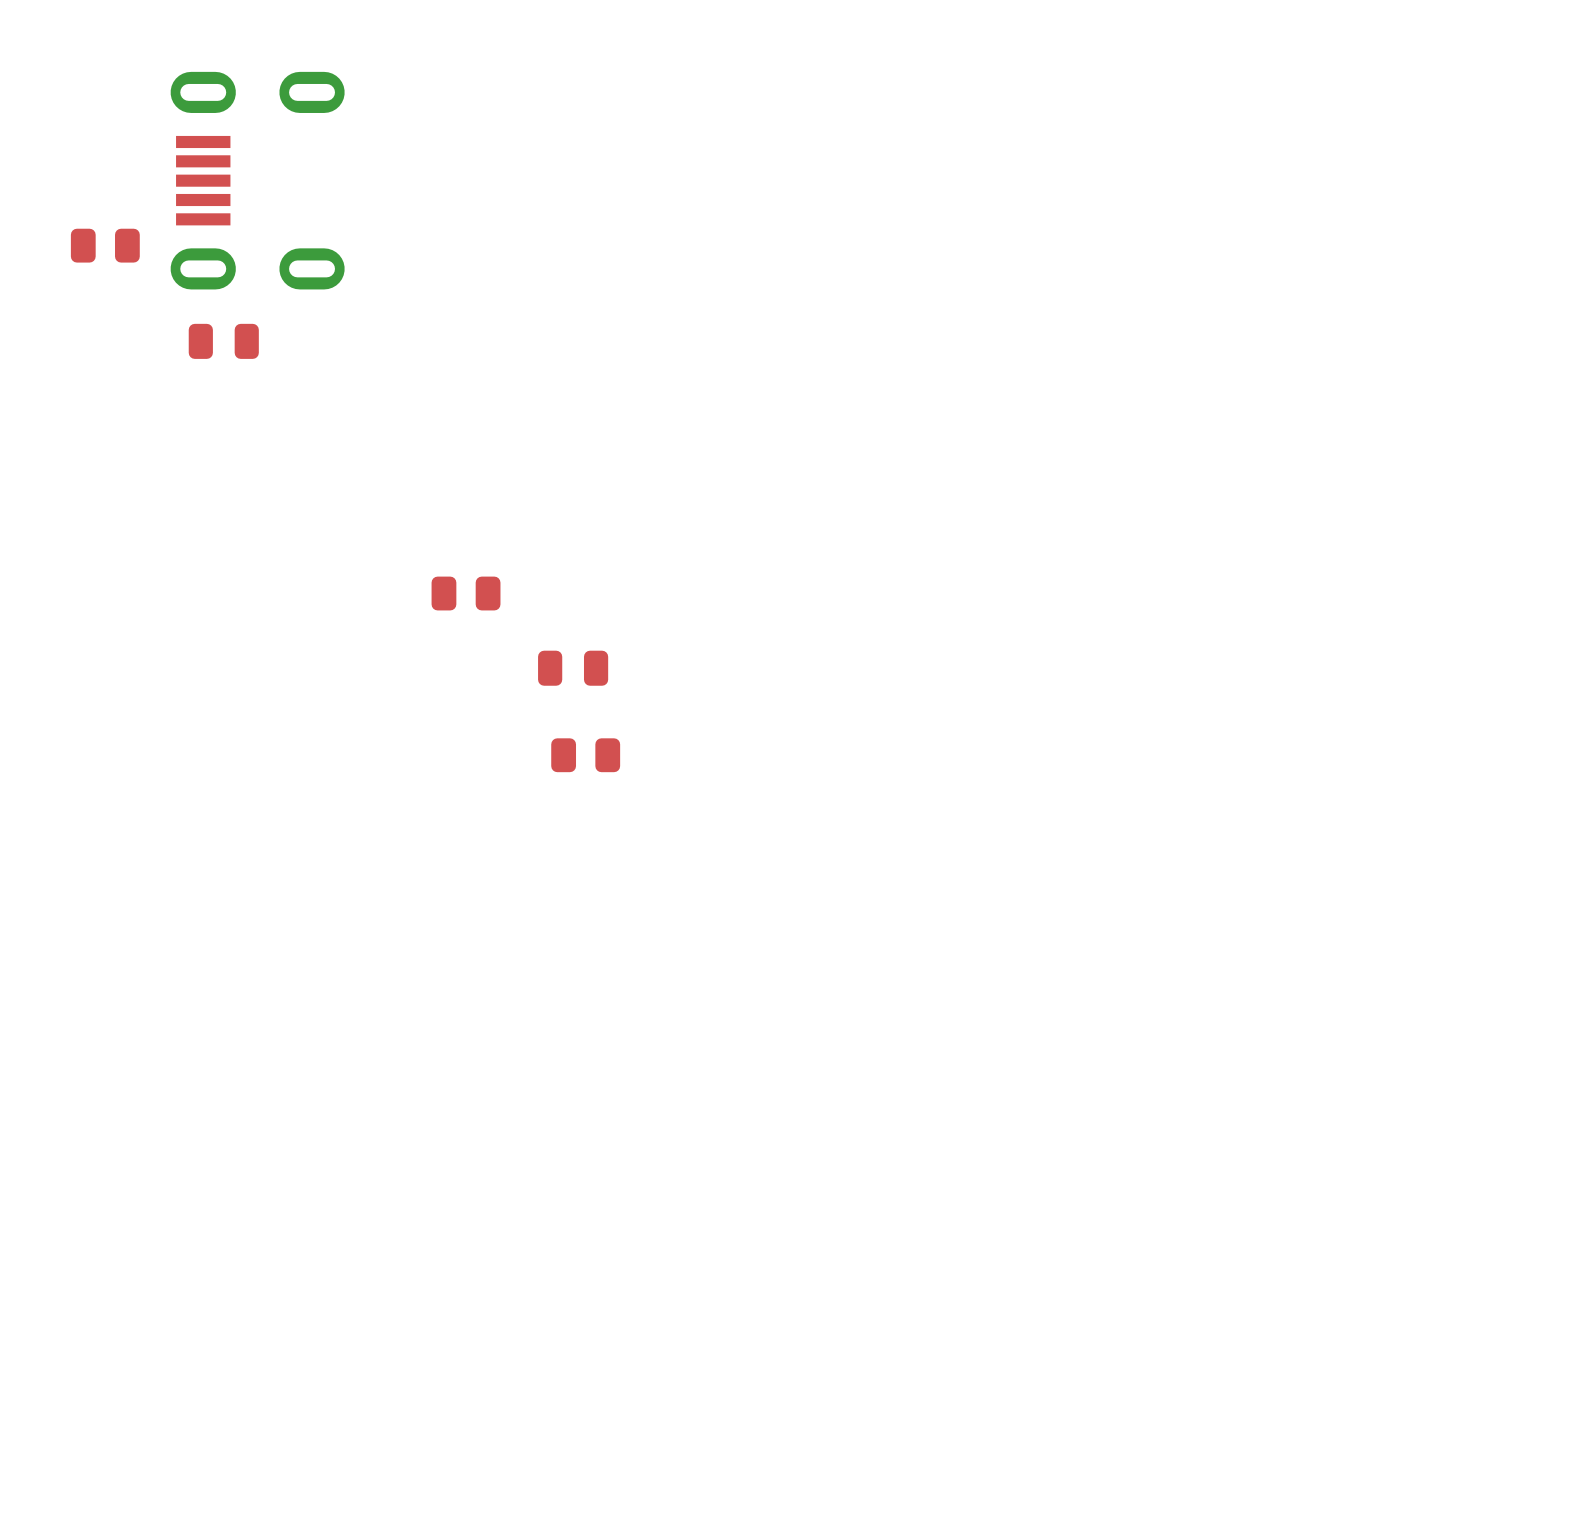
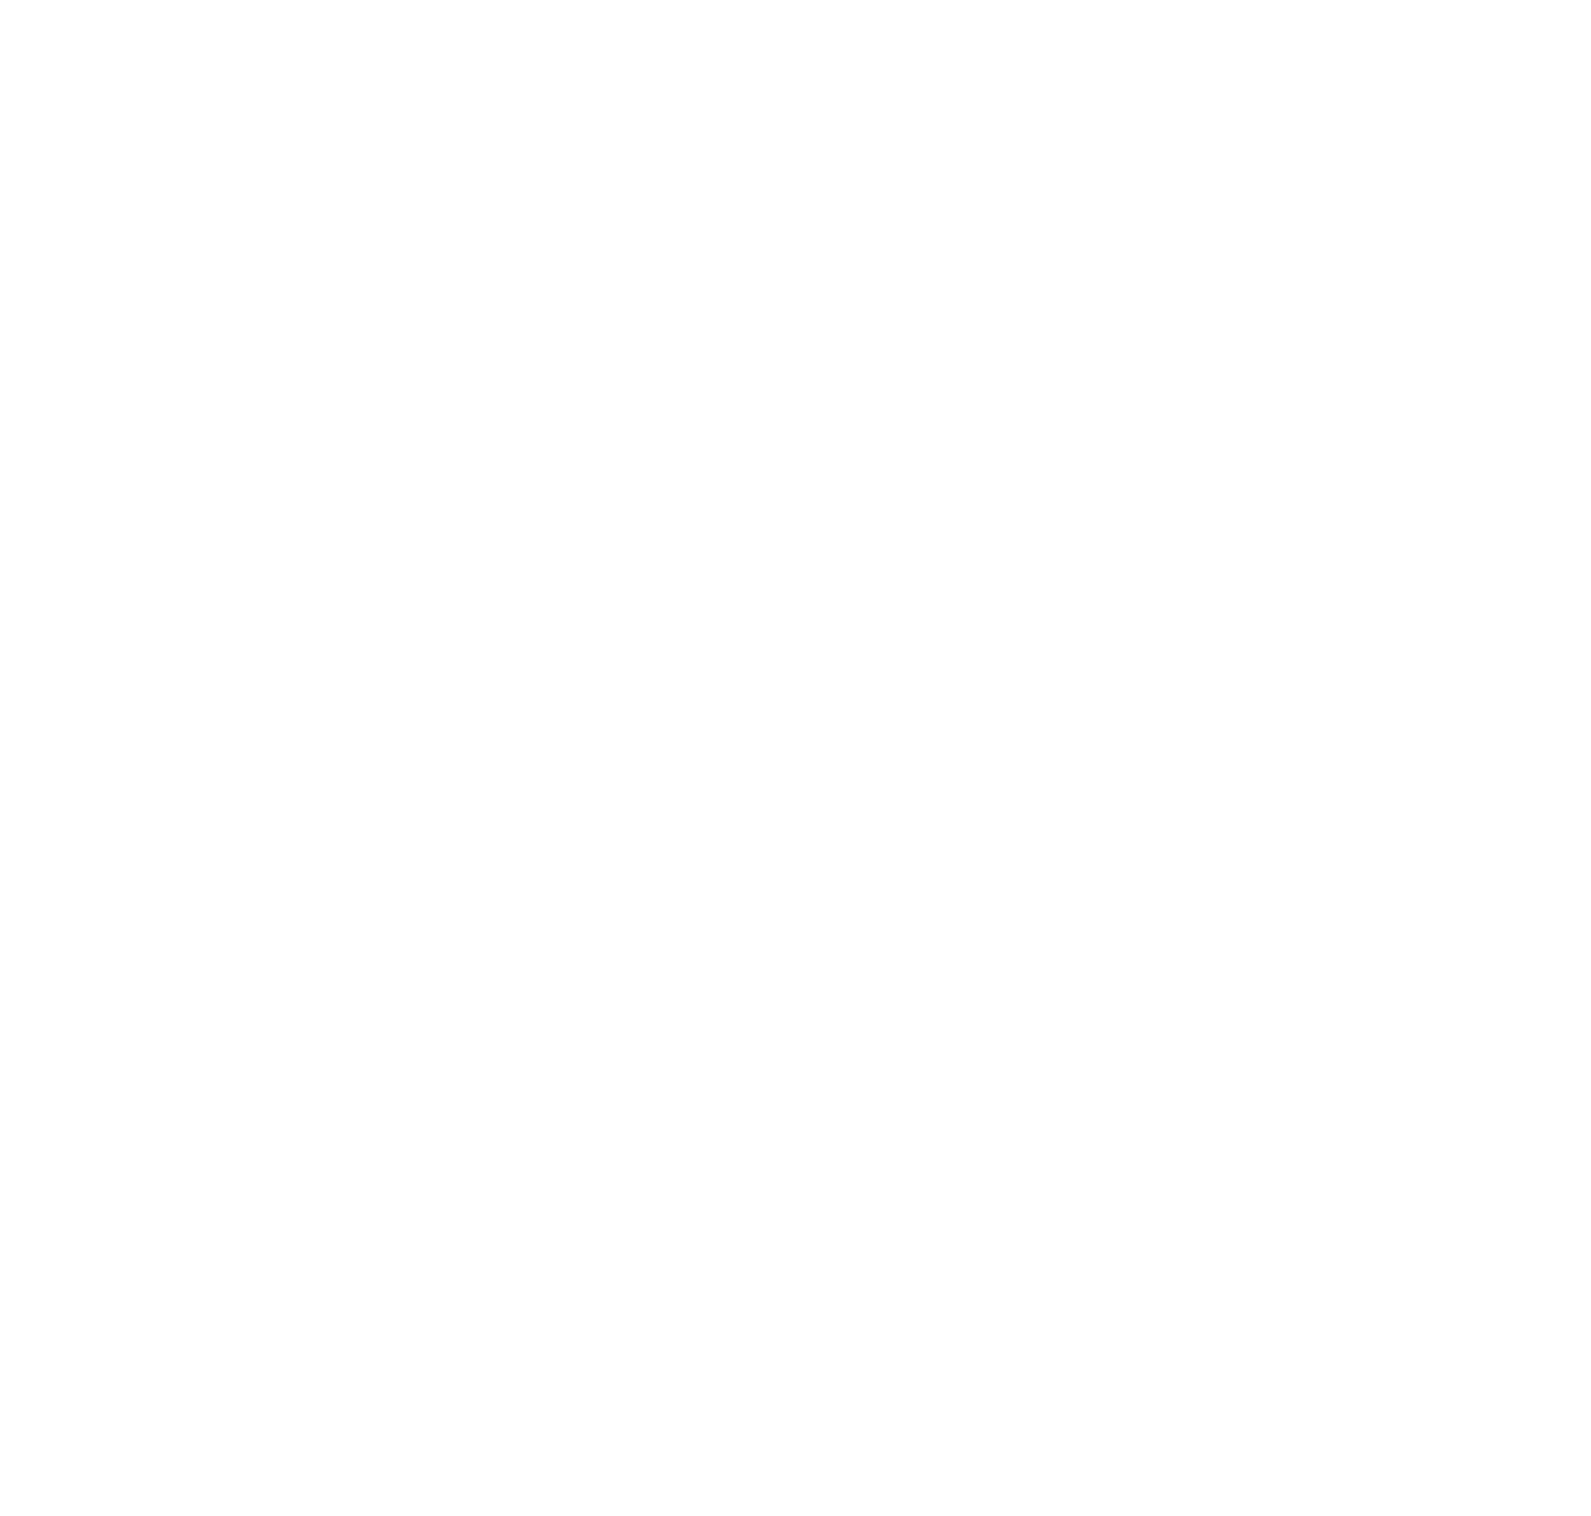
part: (257, 180) -> none
part: (105, 245) -> none
part: (223, 341) -> none
part: (466, 593) -> none
part: (573, 668) -> none
part: (585, 755) -> none

